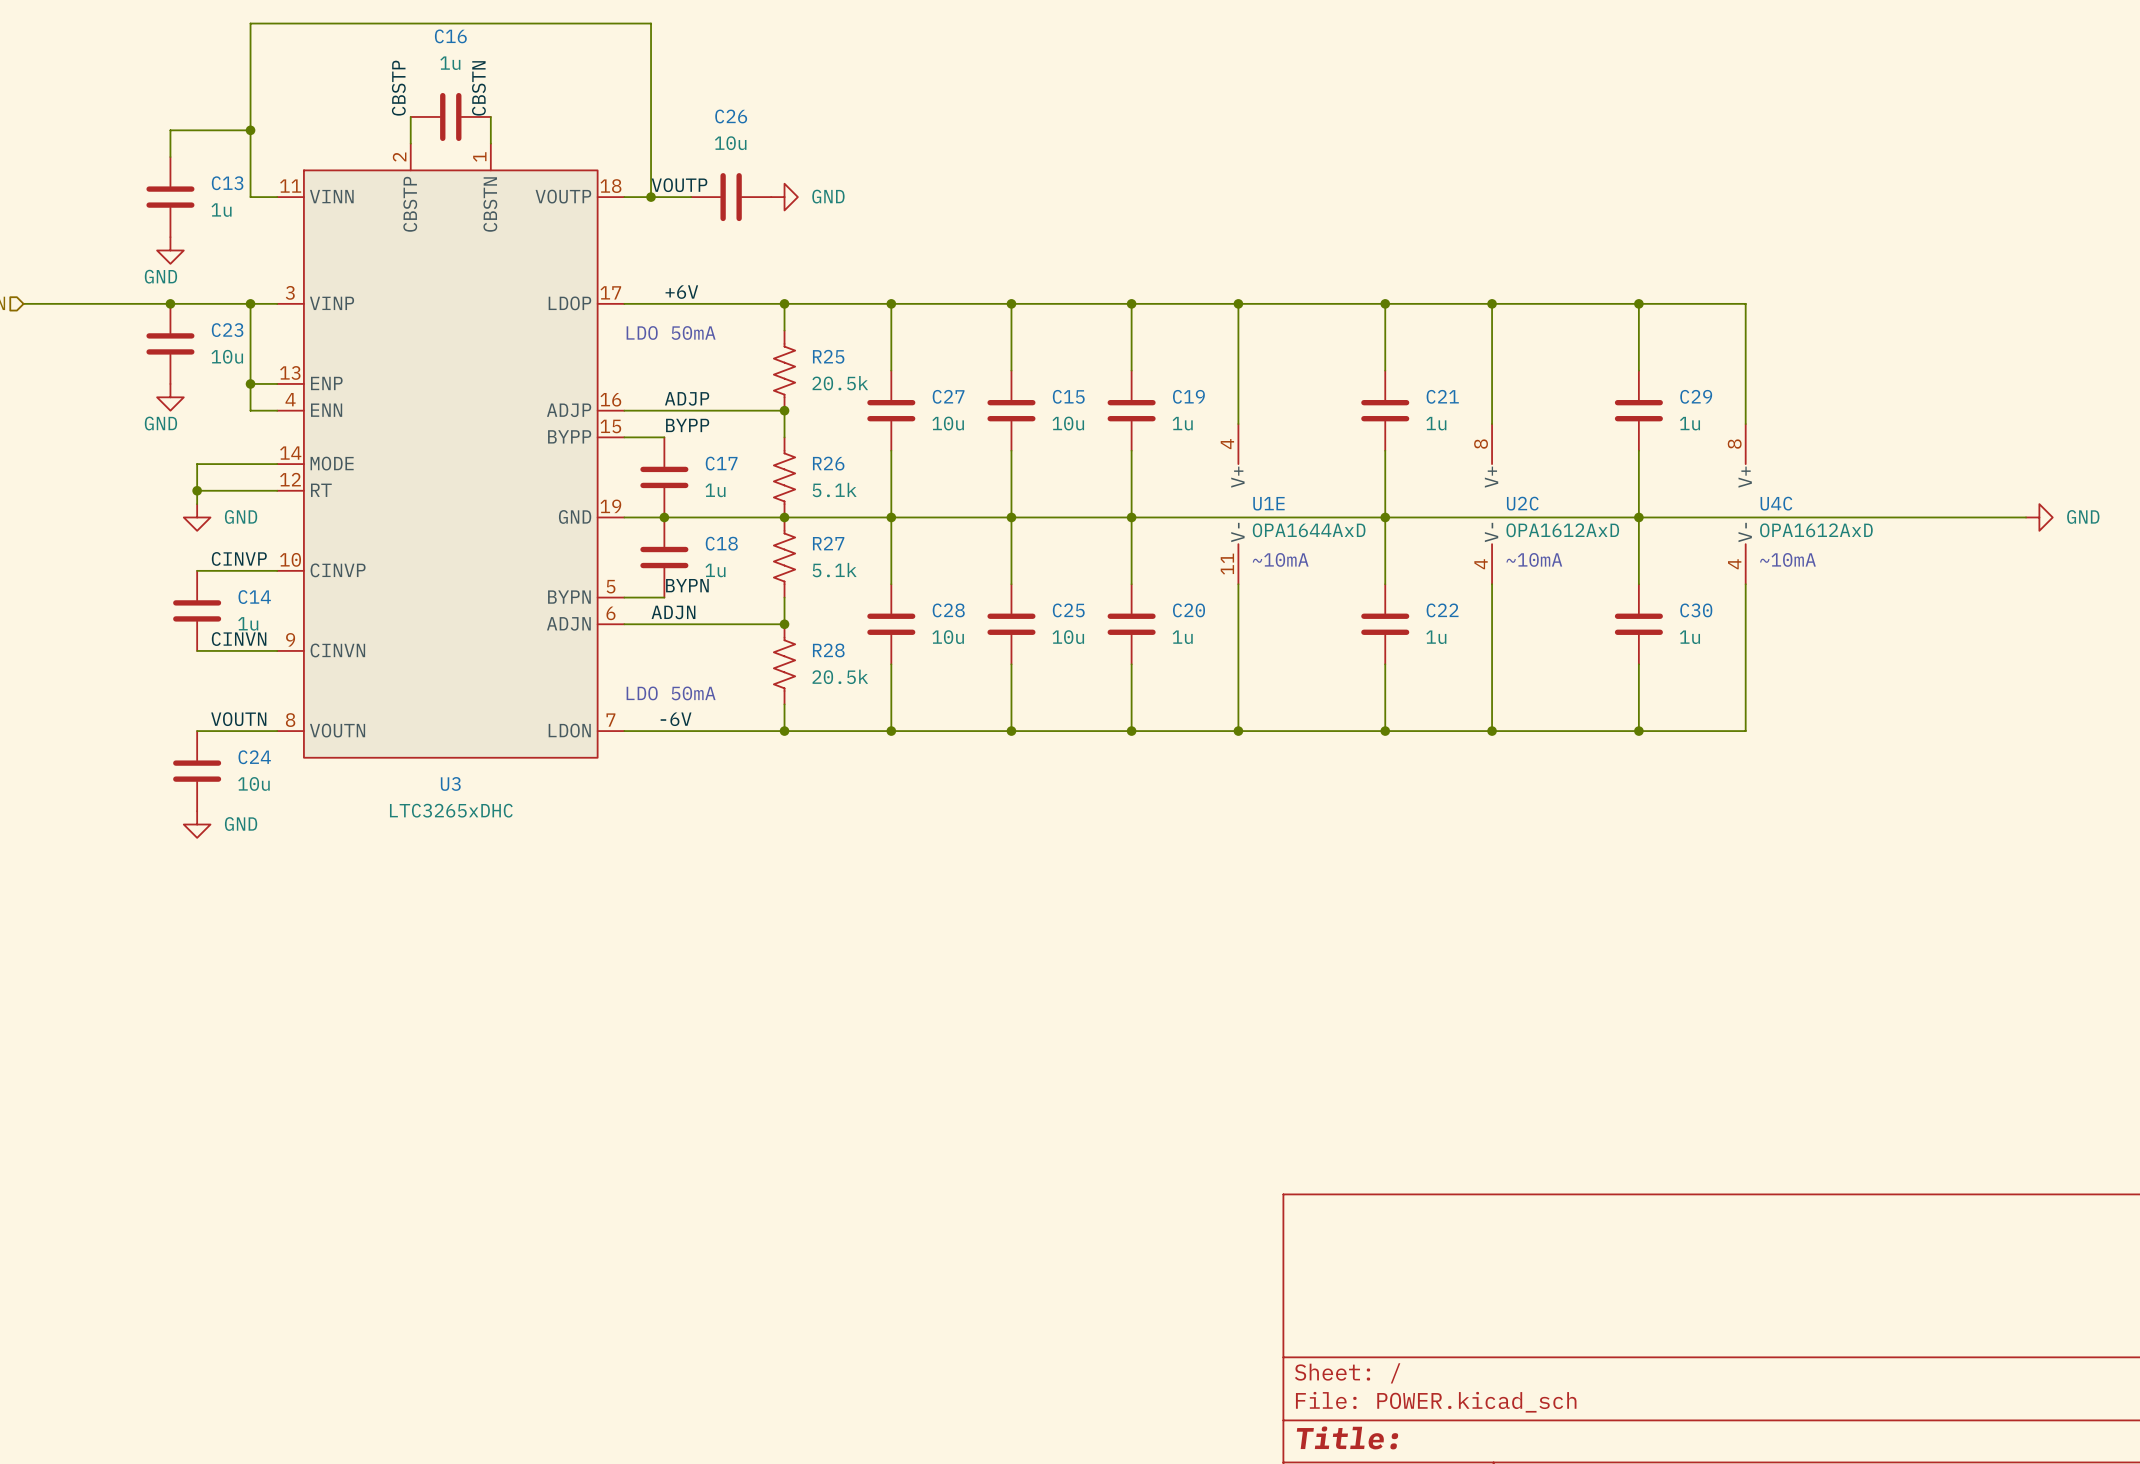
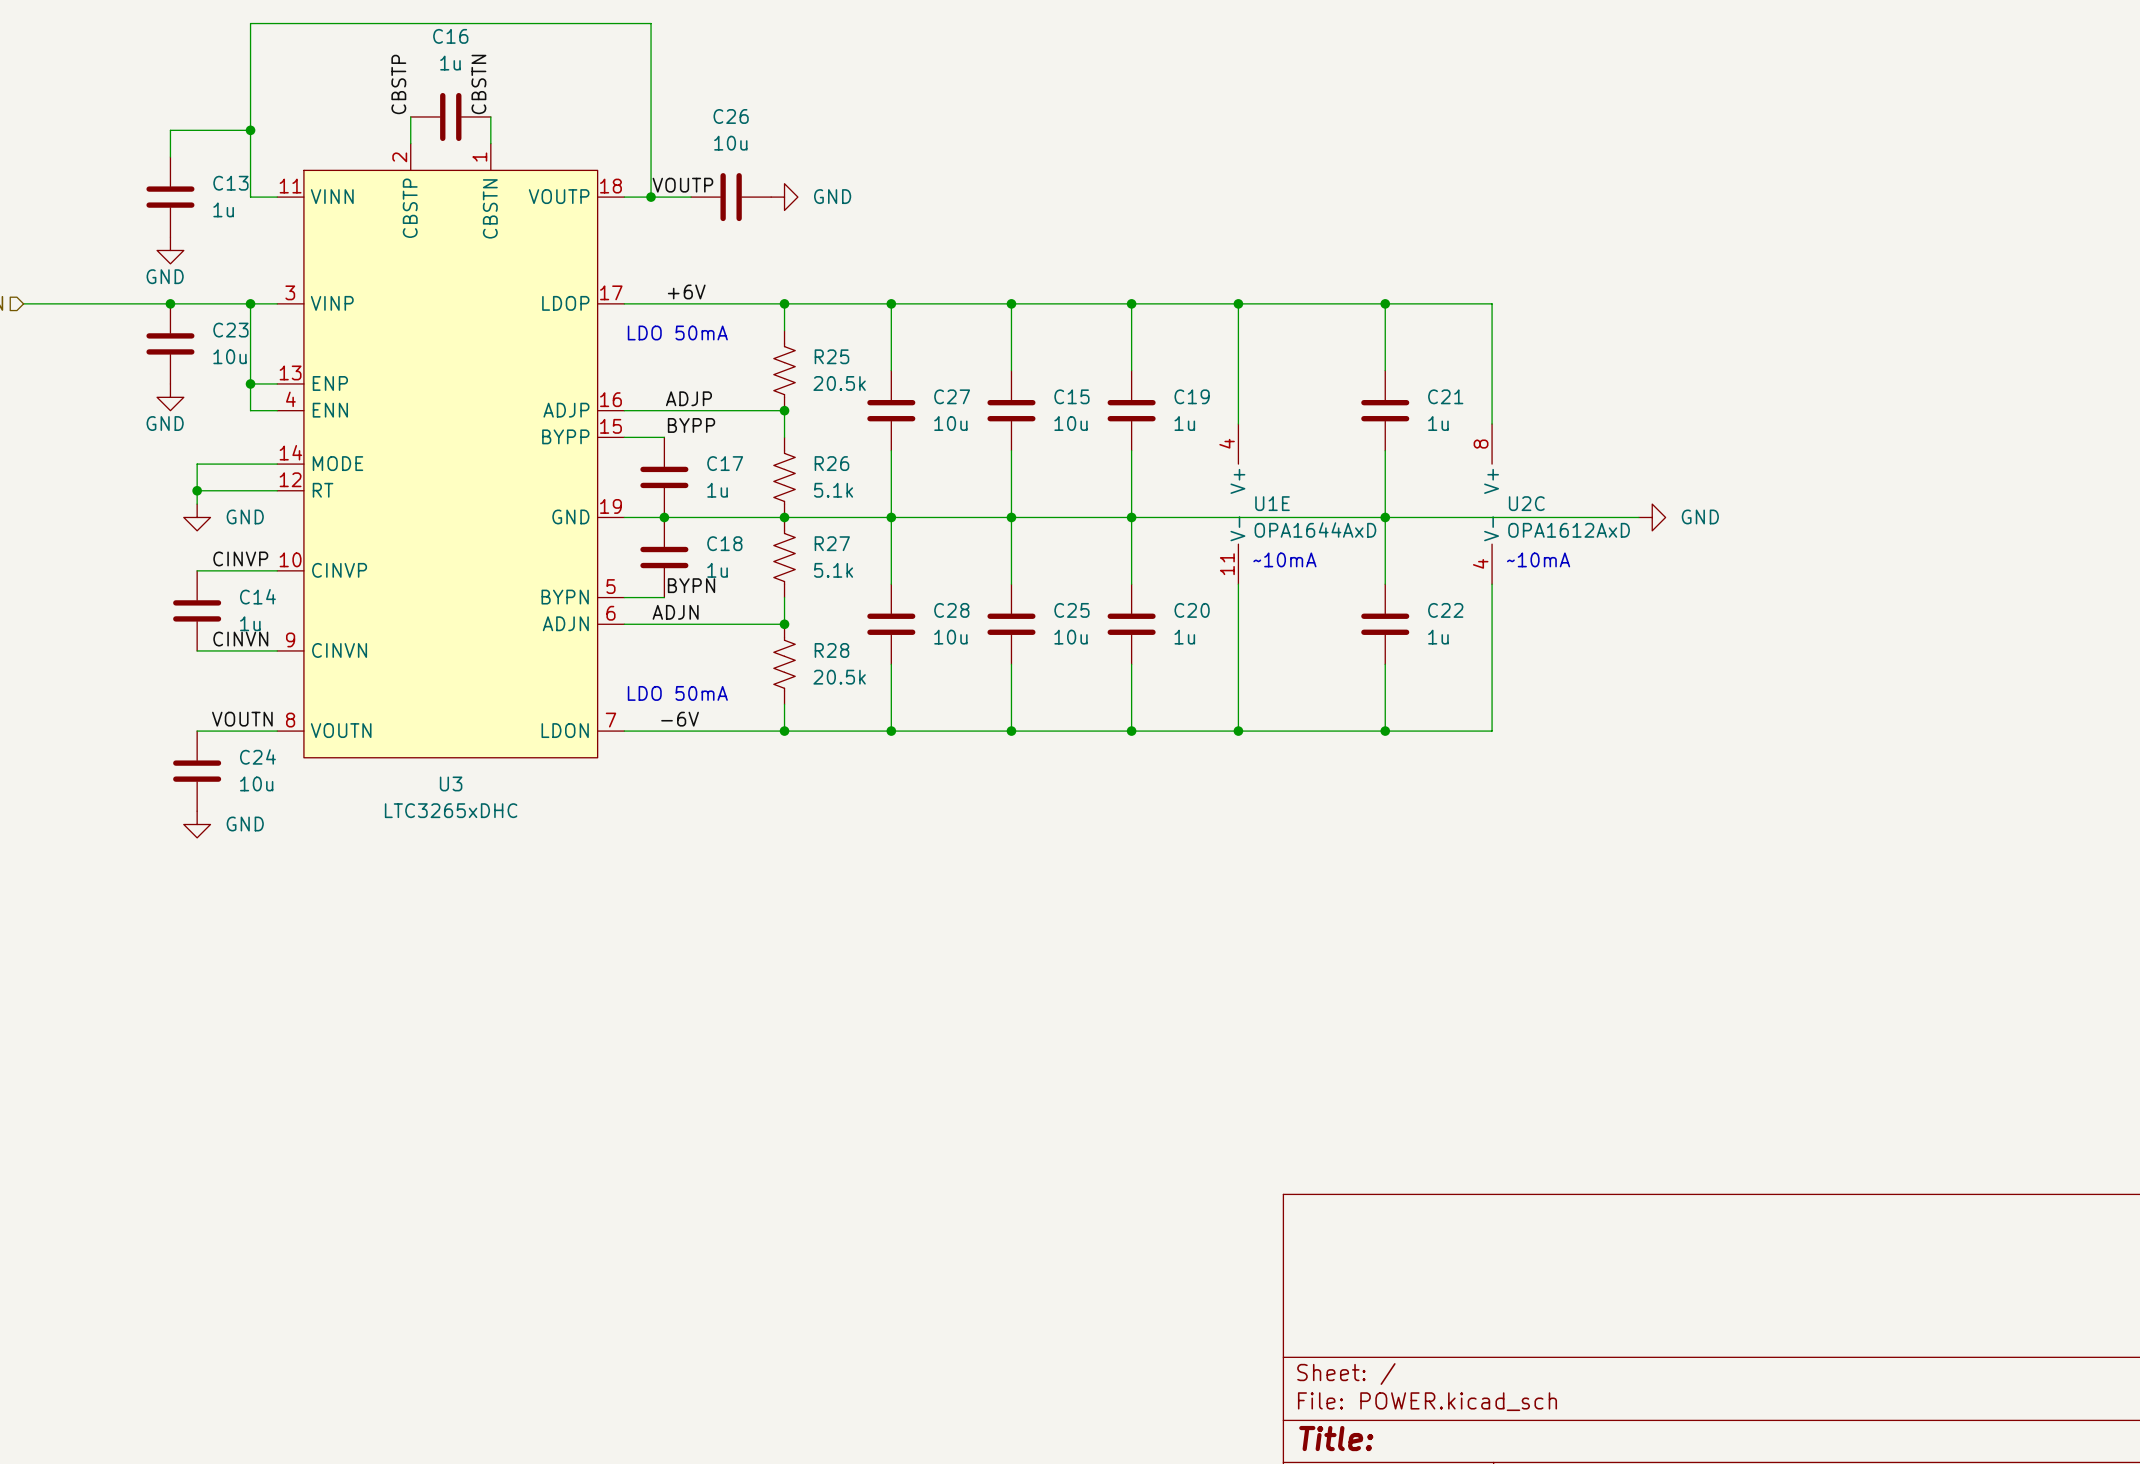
wire: (1492, 303) (1745, 303) (1745, 424) -> none
junction: (1492, 303) -> none
wire: (1638, 303) (1638, 370) -> none
junction: (1638, 303) -> none
C29: 1u (1638, 410) -> none
wire: (1638, 450) (1638, 584) -> none
U4C: OPA1612AxD (1745, 504) -> none
wire: (1638, 517) (2026, 517) -> none
junction: (1638, 517) -> none
power symbol: none -> GND (1652, 517)
power symbol: GND (2039, 517) -> none
text: ~10mA (1787, 559) -> none
wire: (1745, 584) (1745, 731) (1492, 731) -> none
C30: 1u (1638, 624) -> none
wire: (1638, 664) (1638, 731) -> none
junction: (1492, 731) -> none
junction: (1638, 731) -> none

